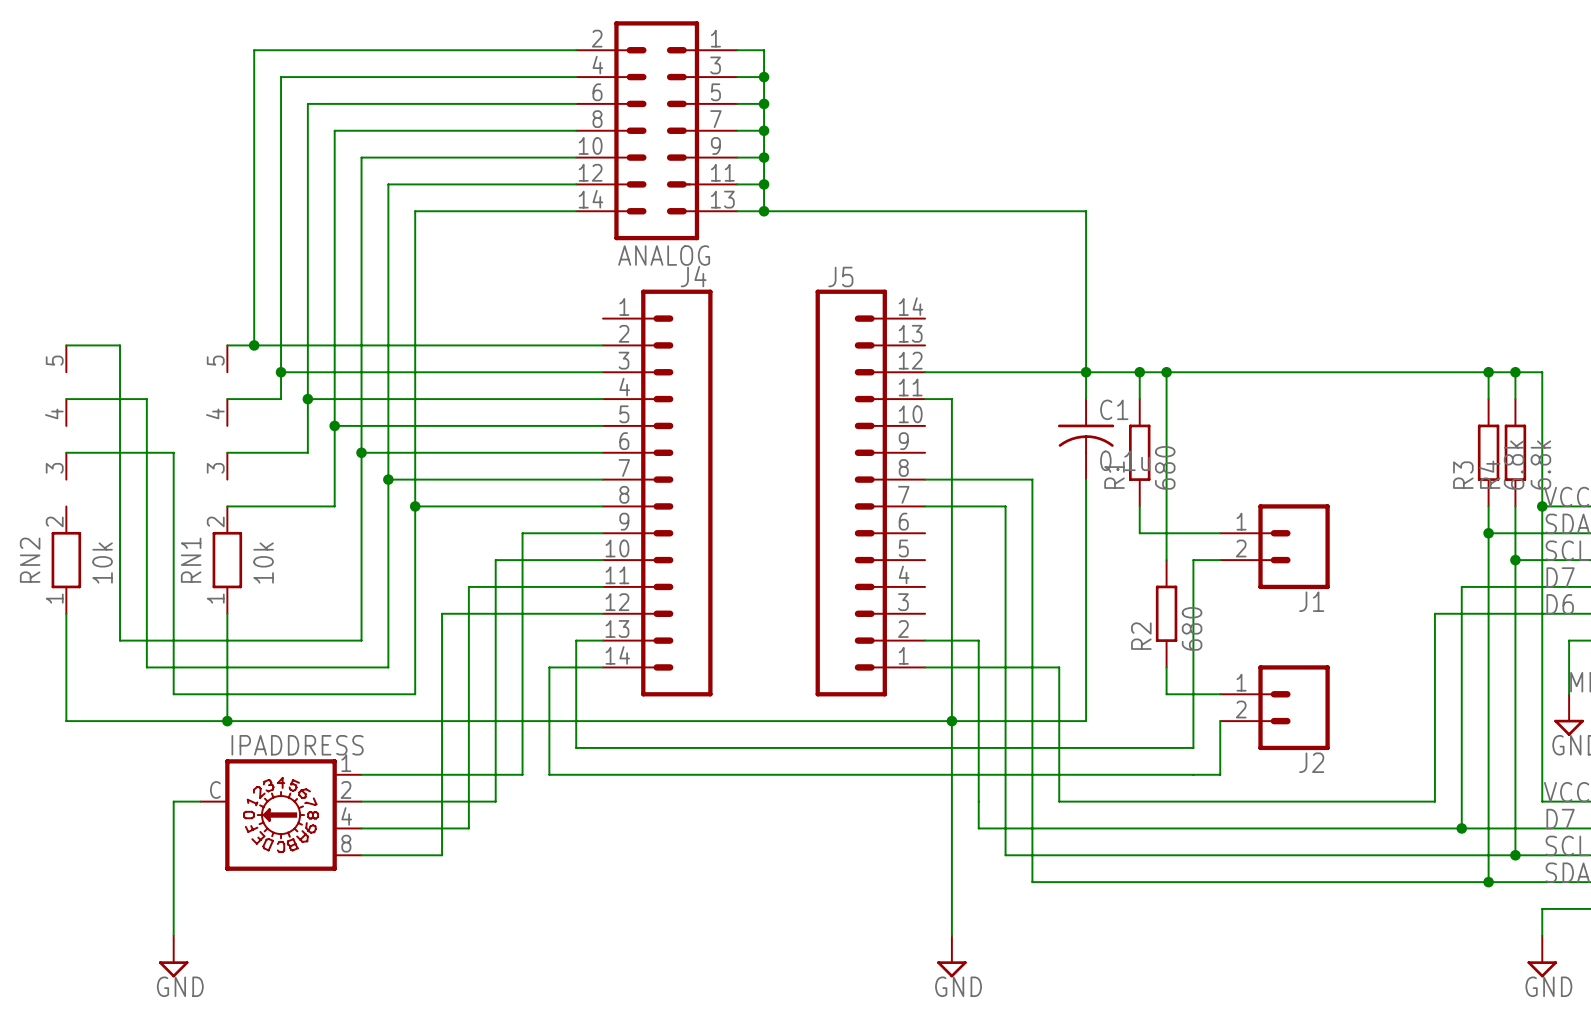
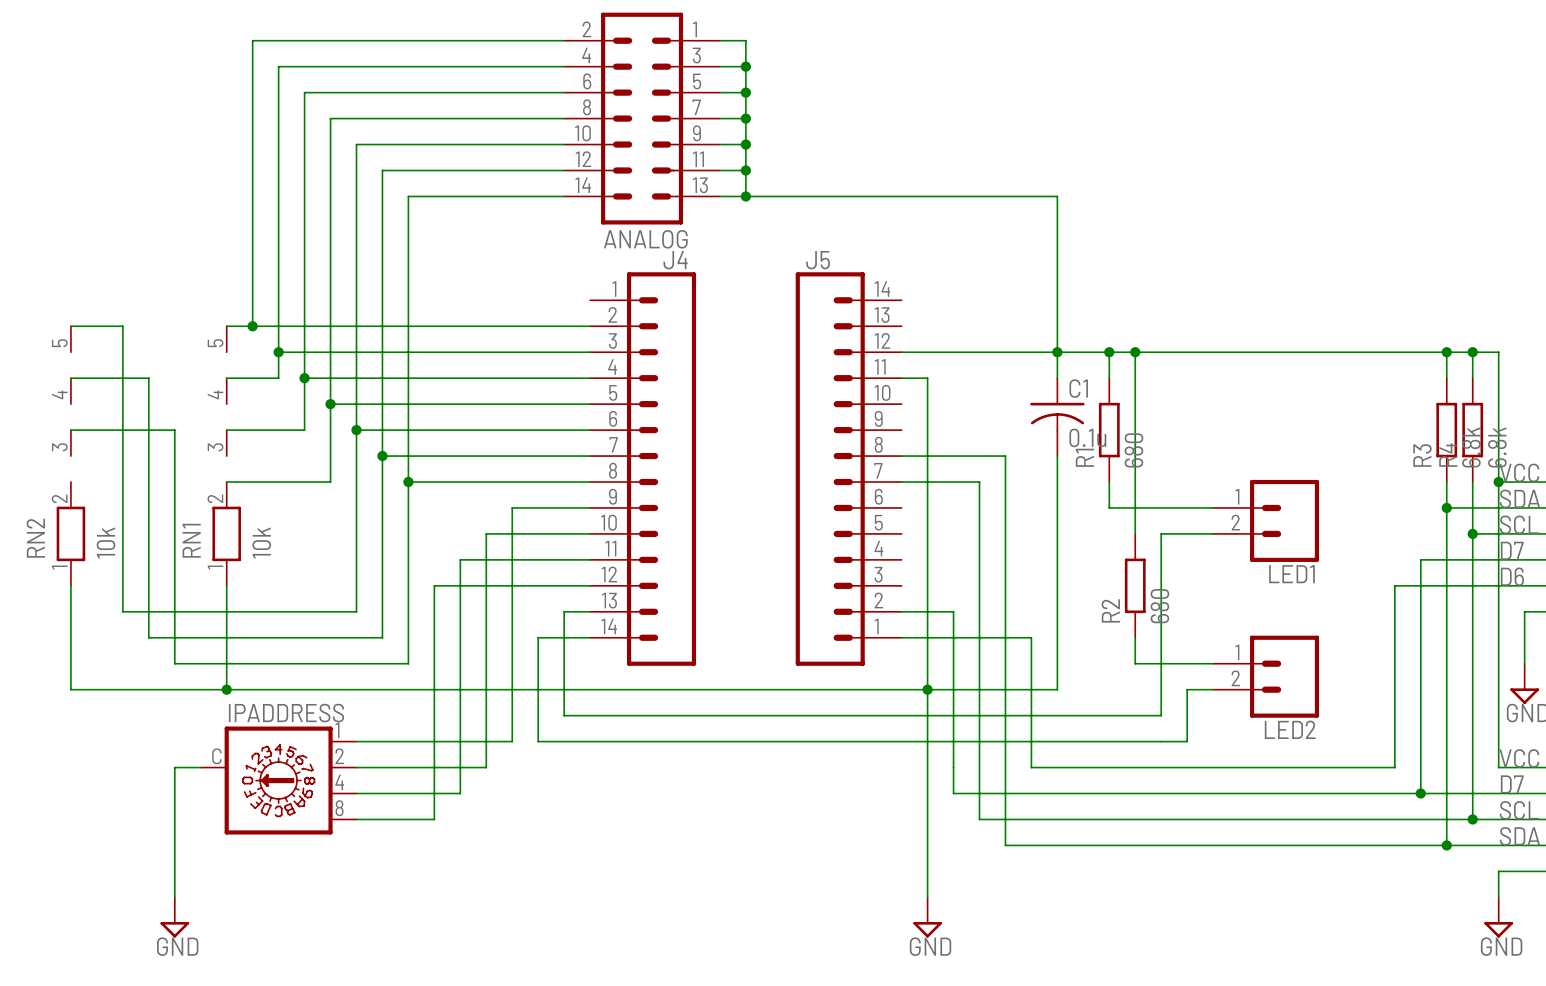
J1: (1274, 546) -> none
LED1: none -> (1266, 520)
J2: (1274, 707) -> none
LED2: none -> (1266, 676)

